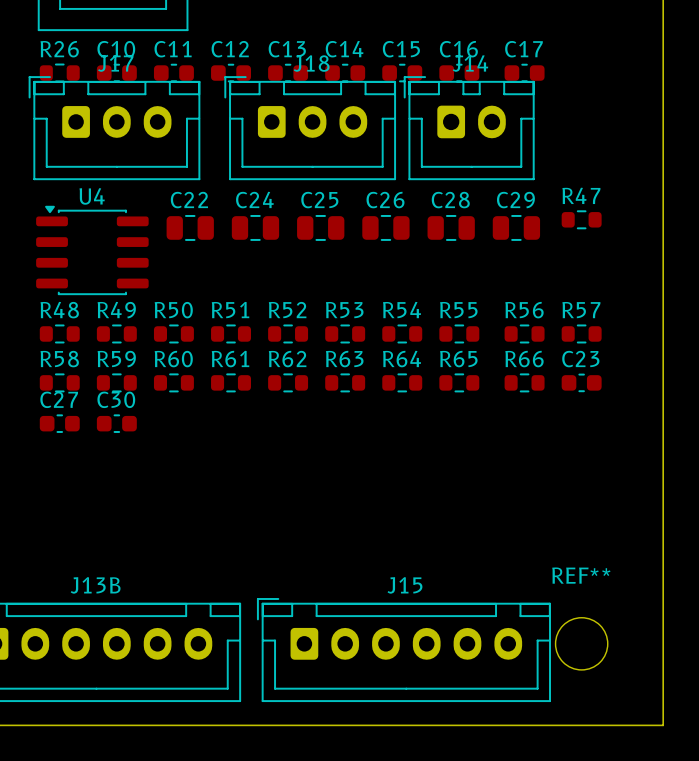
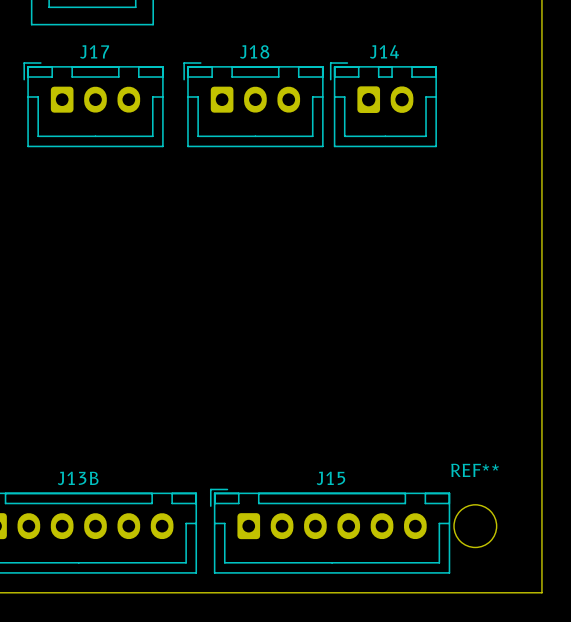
R26: (59, 73) -> none
C10: (116, 73) -> none
C11: (173, 73) -> none
C12: (231, 73) -> none
C13: (288, 73) -> none
C14: (345, 73) -> none
C15: (402, 73) -> none
C16: (459, 73) -> none
C17: (524, 73) -> none
R47: (581, 219) -> none
C22: (190, 227) -> none
C24: (255, 227) -> none
C25: (320, 227) -> none
C26: (385, 227) -> none
C28: (451, 227) -> none
C29: (516, 227) -> none
U4: (92, 250) -> none
R48: (59, 333) -> none
R49: (116, 333) -> none
R50: (173, 333) -> none
R51: (231, 333) -> none
R52: (288, 333) -> none
R53: (345, 333) -> none
R54: (402, 333) -> none
R55: (459, 333) -> none
R56: (524, 333) -> none
R57: (581, 333) -> none
R58: (59, 382) -> none
R59: (116, 382) -> none
R60: (173, 382) -> none
R61: (231, 382) -> none
R62: (288, 382) -> none
R63: (345, 382) -> none
R64: (402, 382) -> none
R65: (459, 382) -> none
R66: (524, 382) -> none
C23: (581, 382) -> none
C27: (59, 423) -> none
C30: (116, 423) -> none

